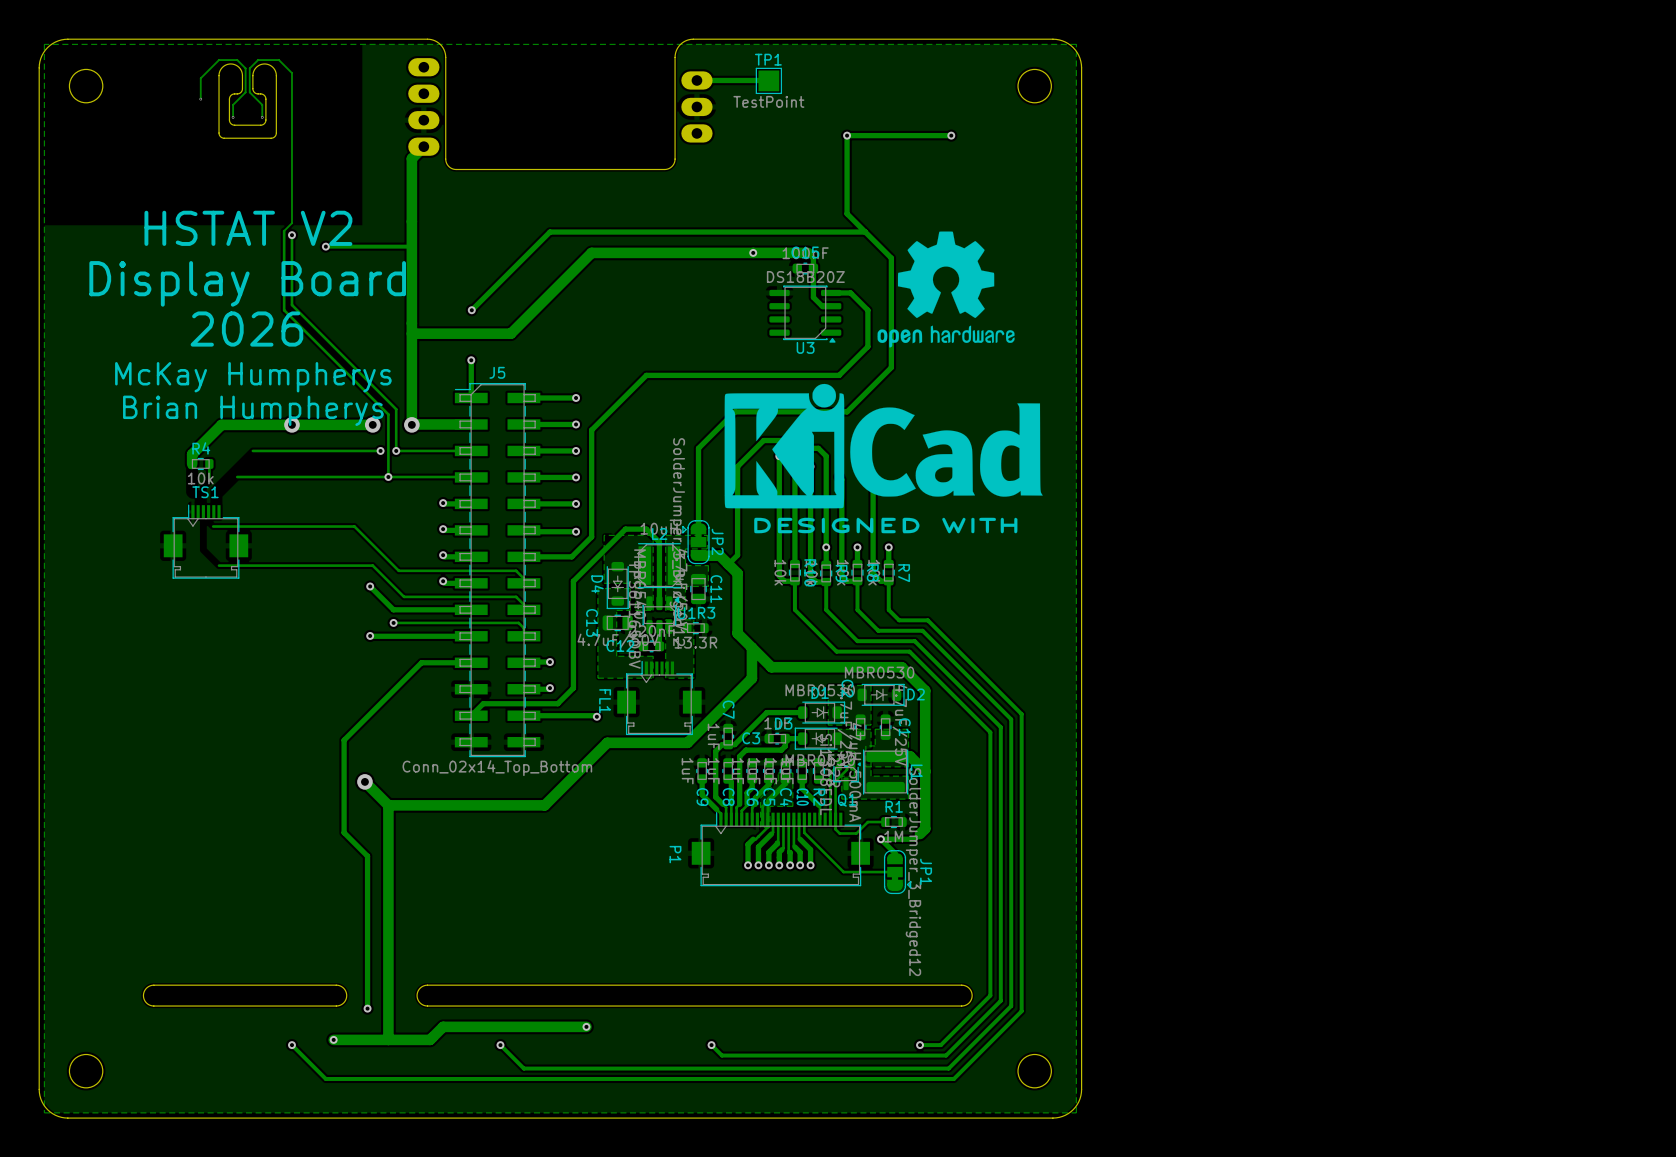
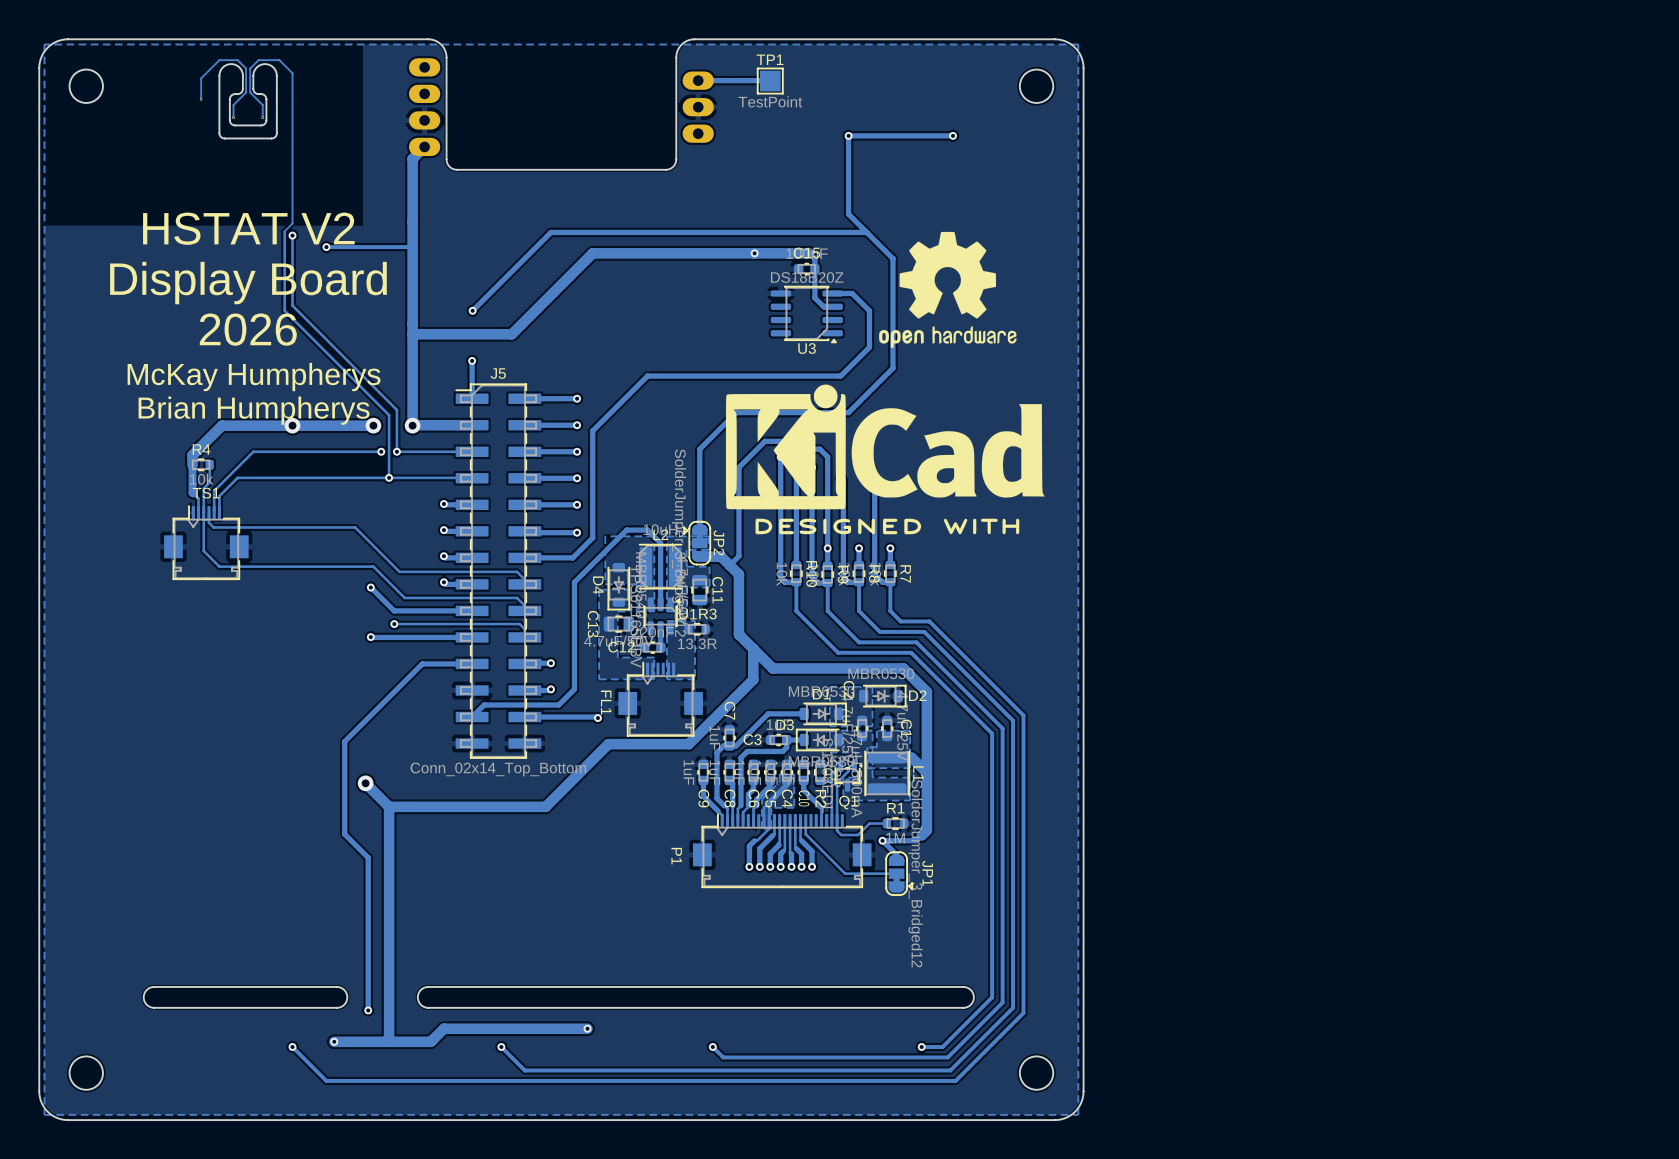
track: none -> (253, 451) (214, 490) (214, 512)
track: none -> (192, 464) (192, 492) (198, 498) (198, 512)
track: none -> (237, 477) (219, 496) (219, 512)
track: none -> (209, 482) (203, 488) (203, 550) (219, 566)
track: none -> (208, 512) (208, 522) (213, 527)

